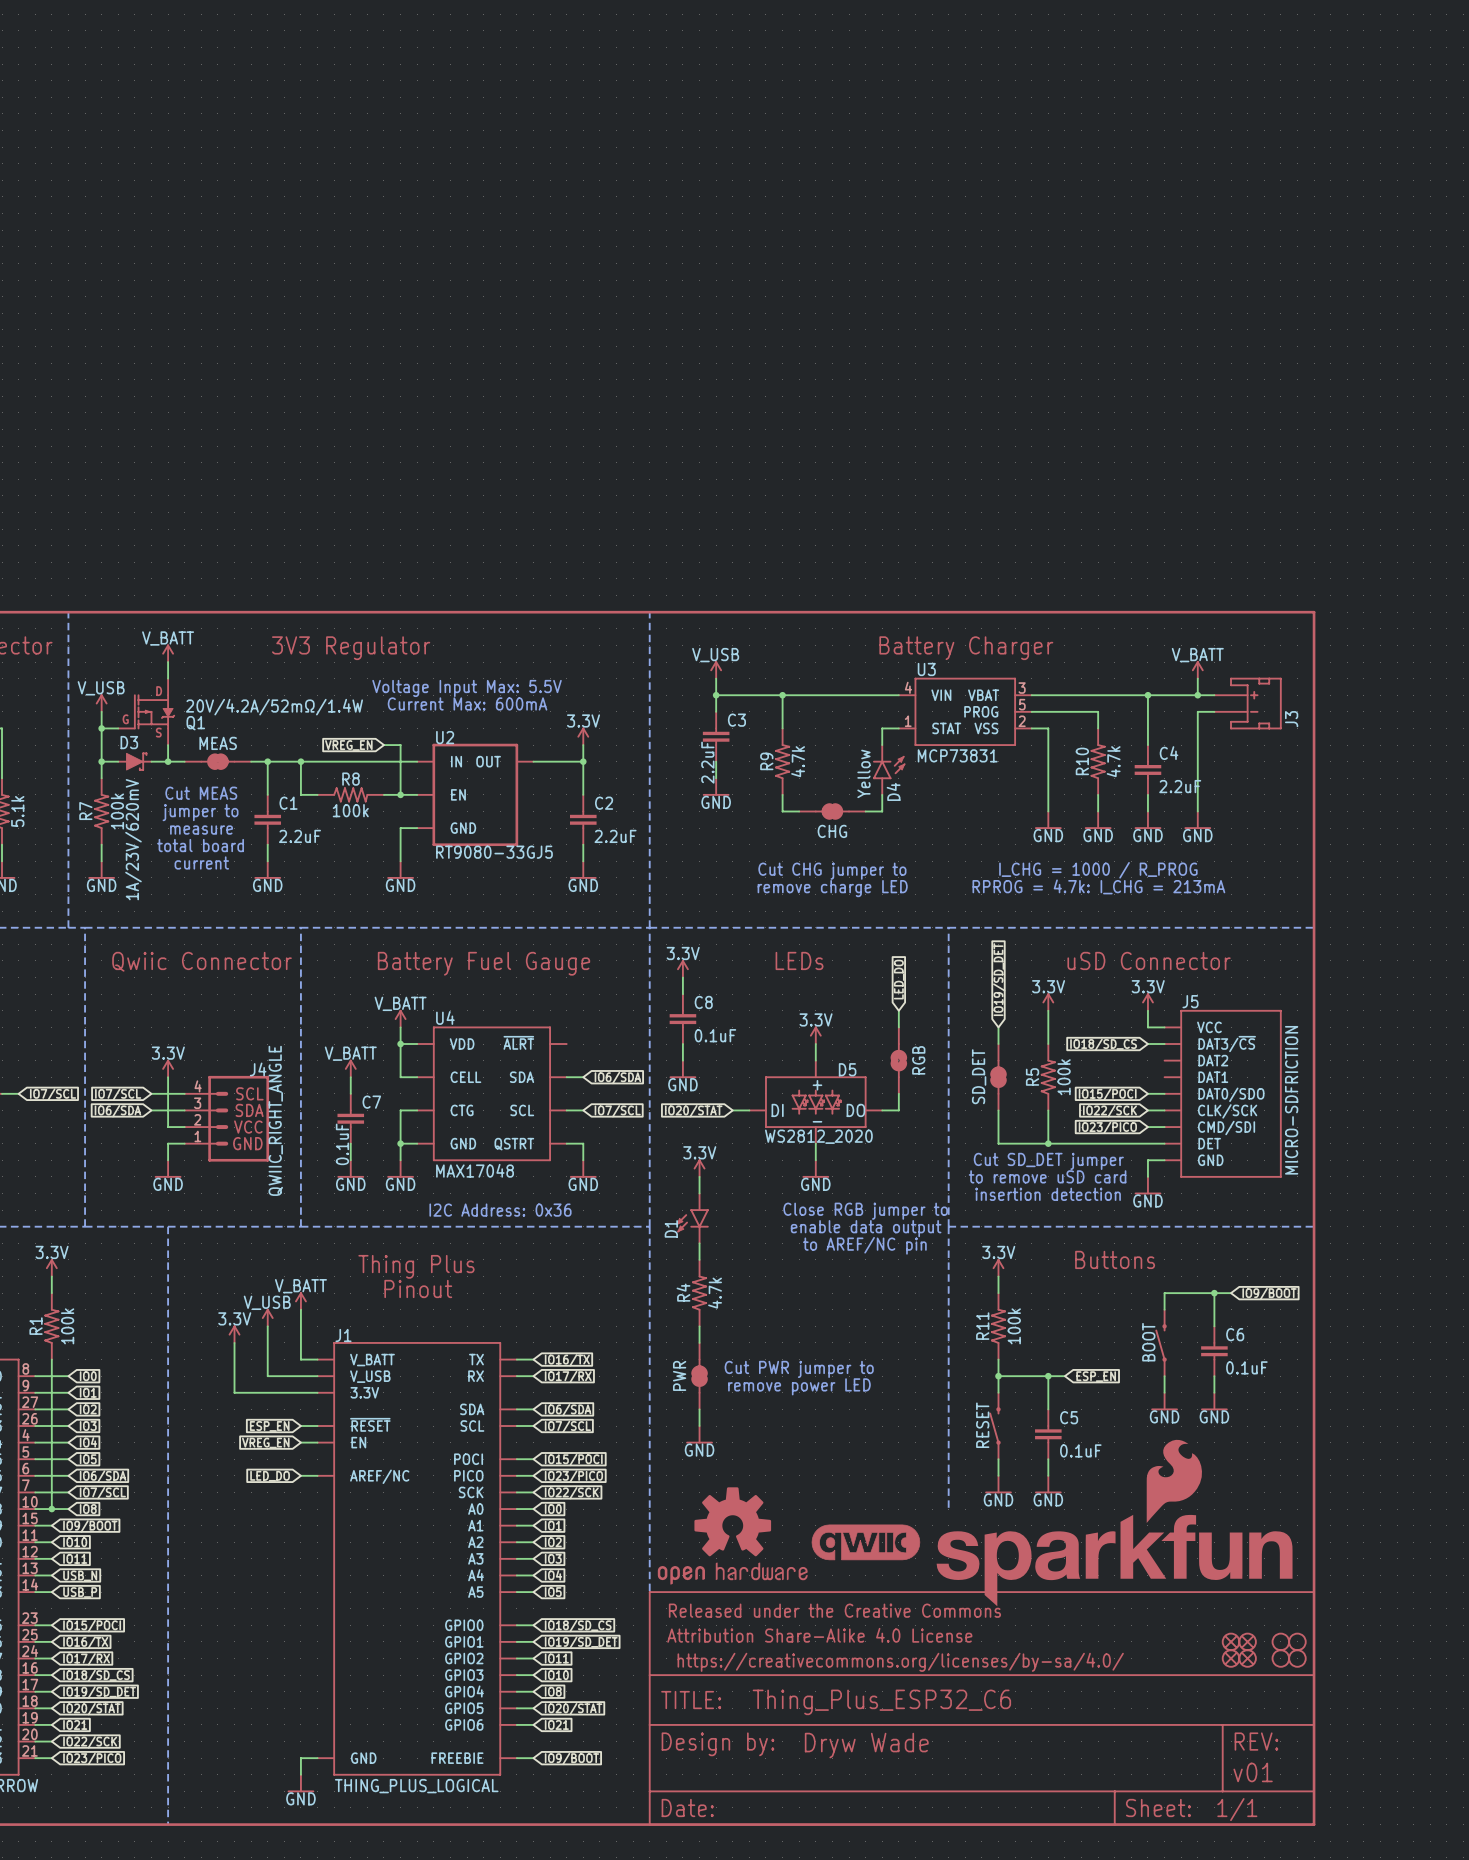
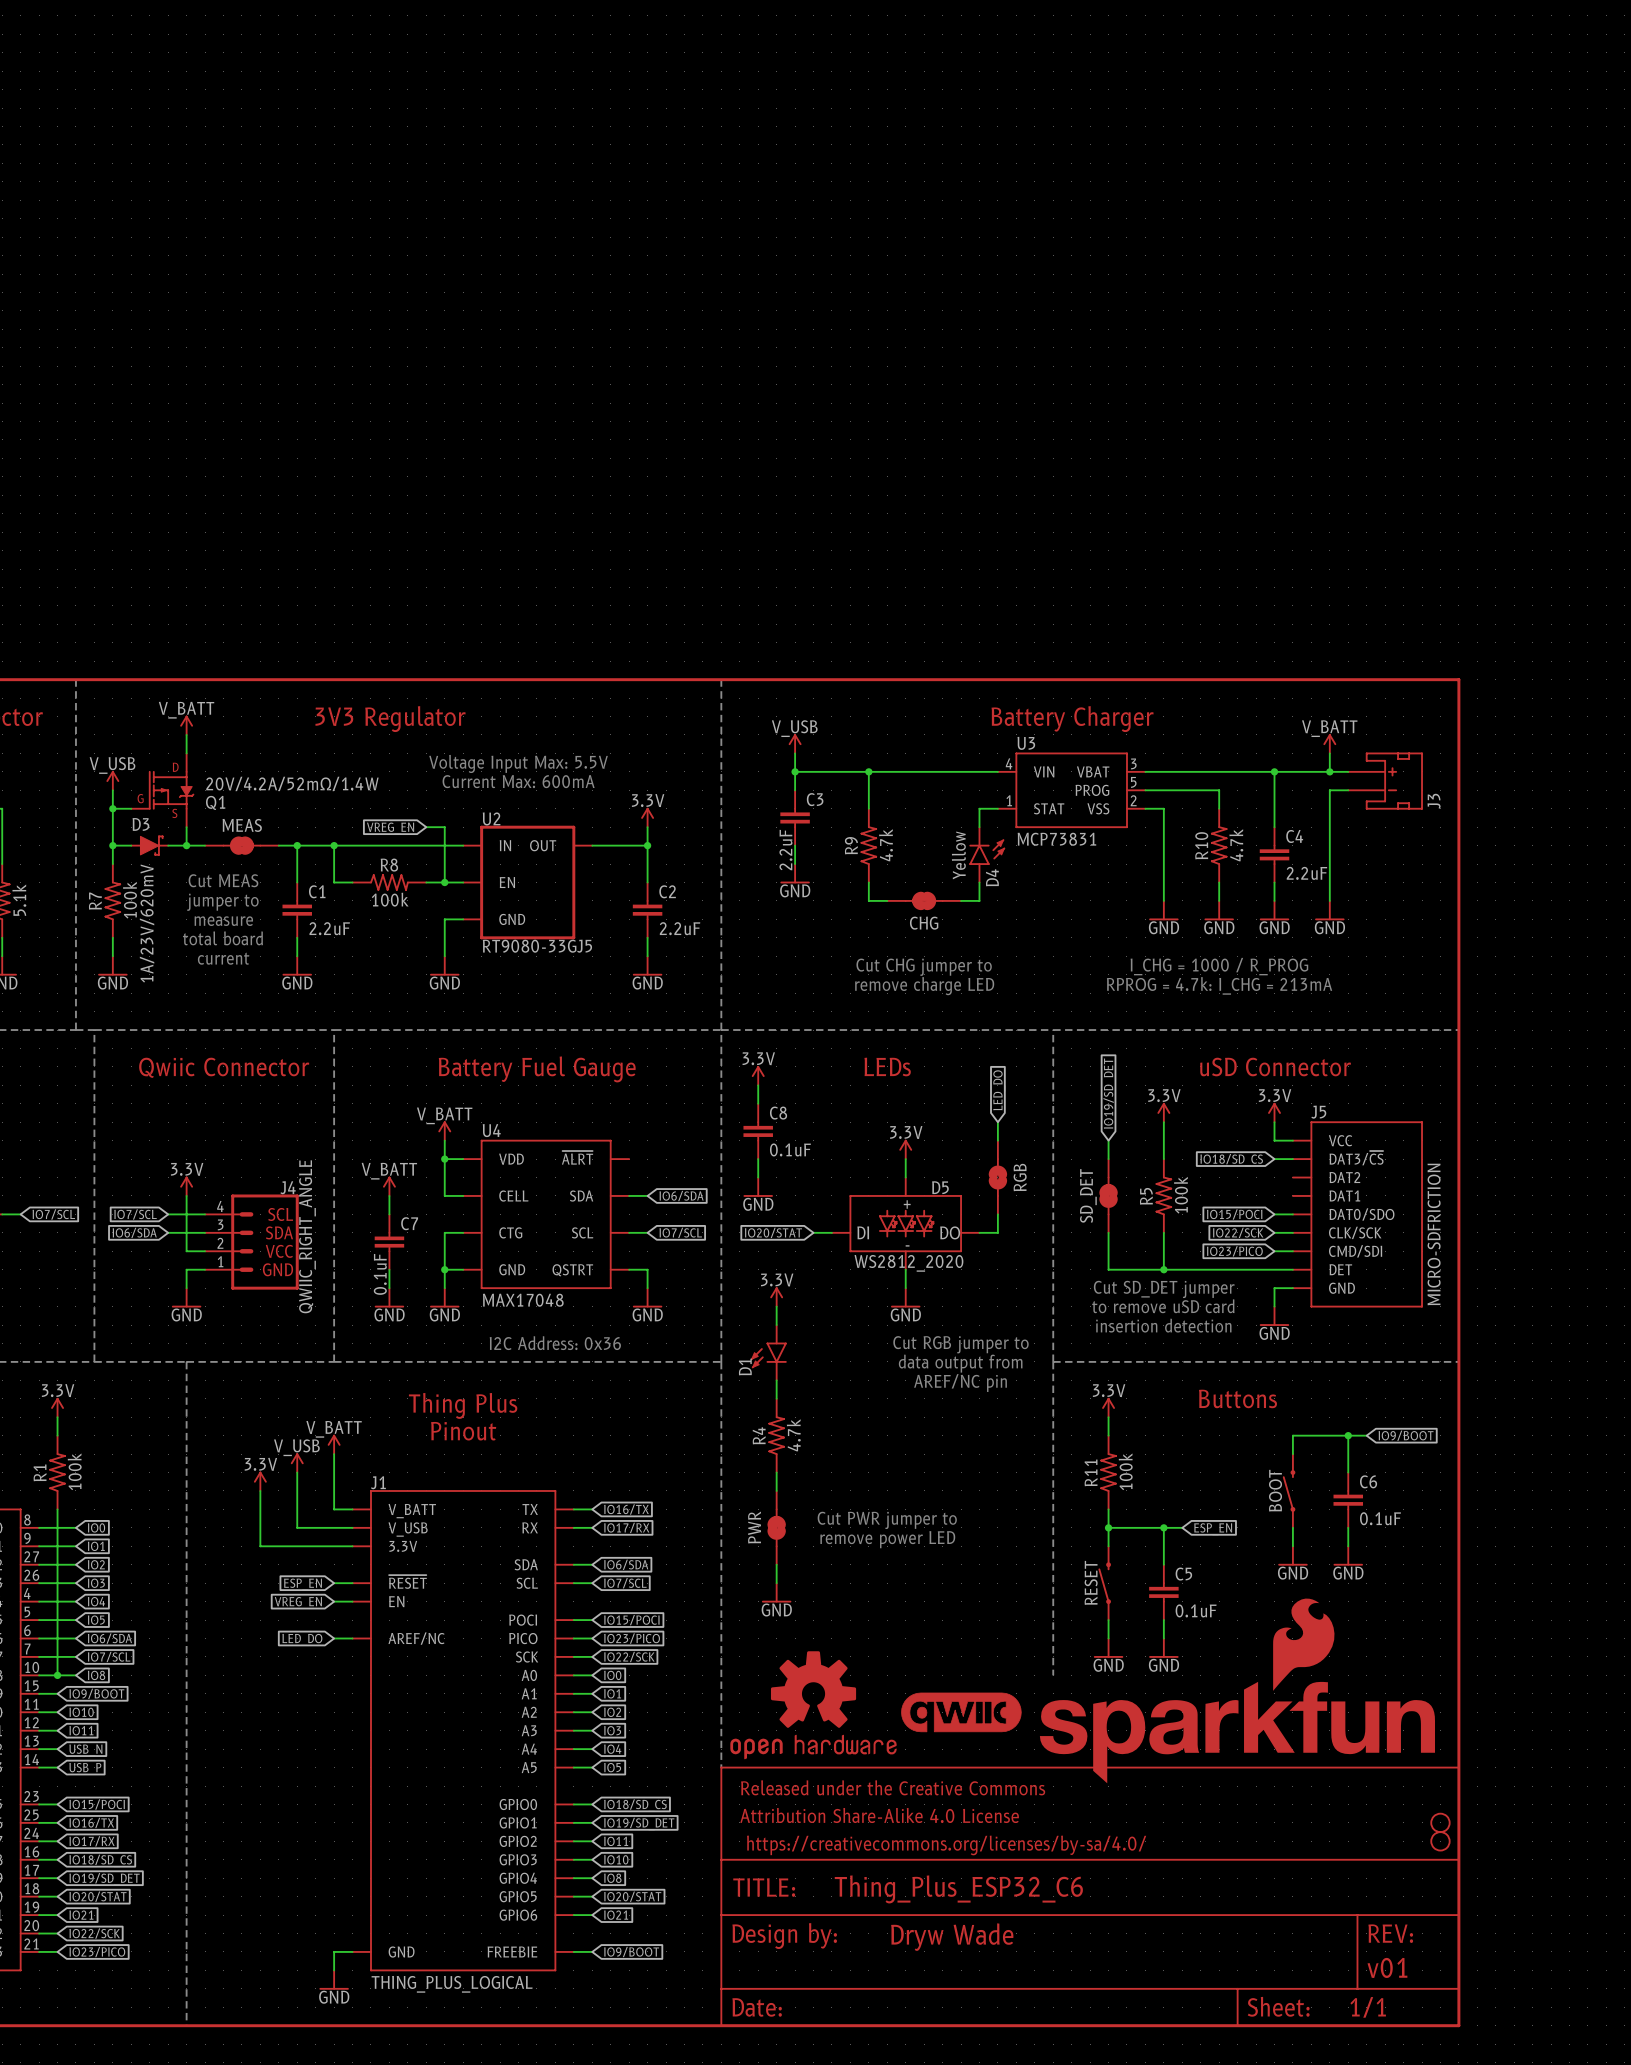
text: Close RGB jumper to (865, 1211) -> Cut RGB jumper to (961, 1344)
text: enable data output (866, 1228) -> data output from (960, 1363)
text: to AREF/NC pin (864, 1245) -> AREF/NC pin (960, 1383)
part: (1231, 1641) -> none
part: (1247, 1641) -> none
part: (1280, 1641) -> none
part: (1231, 1658) -> none
part: (1247, 1658) -> none
part: (1280, 1658) -> none

